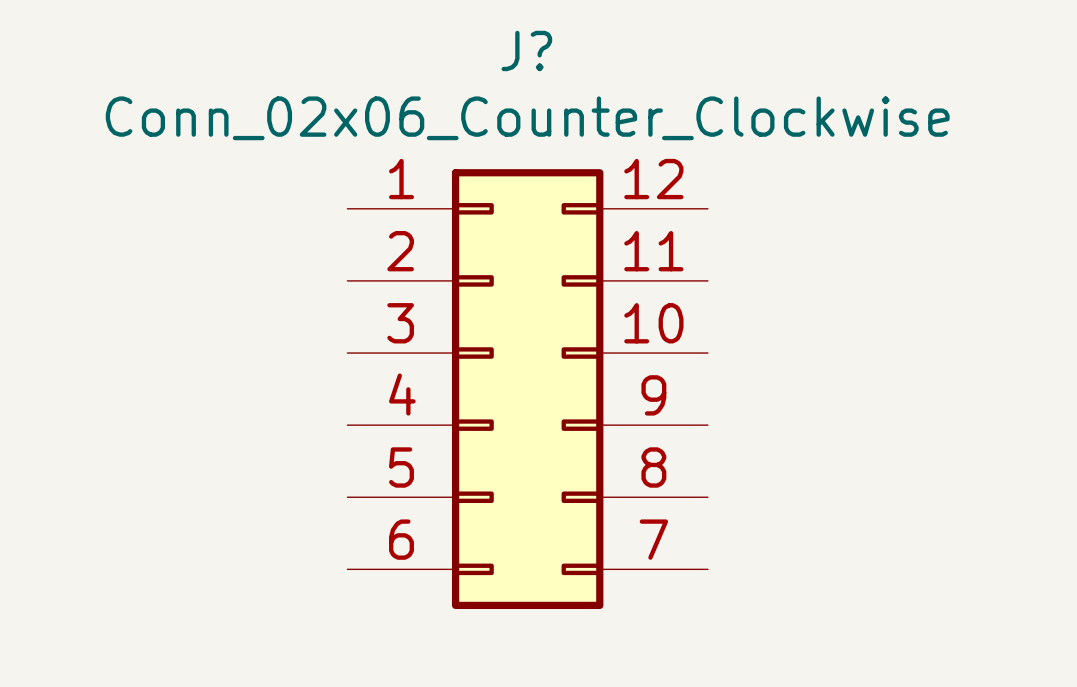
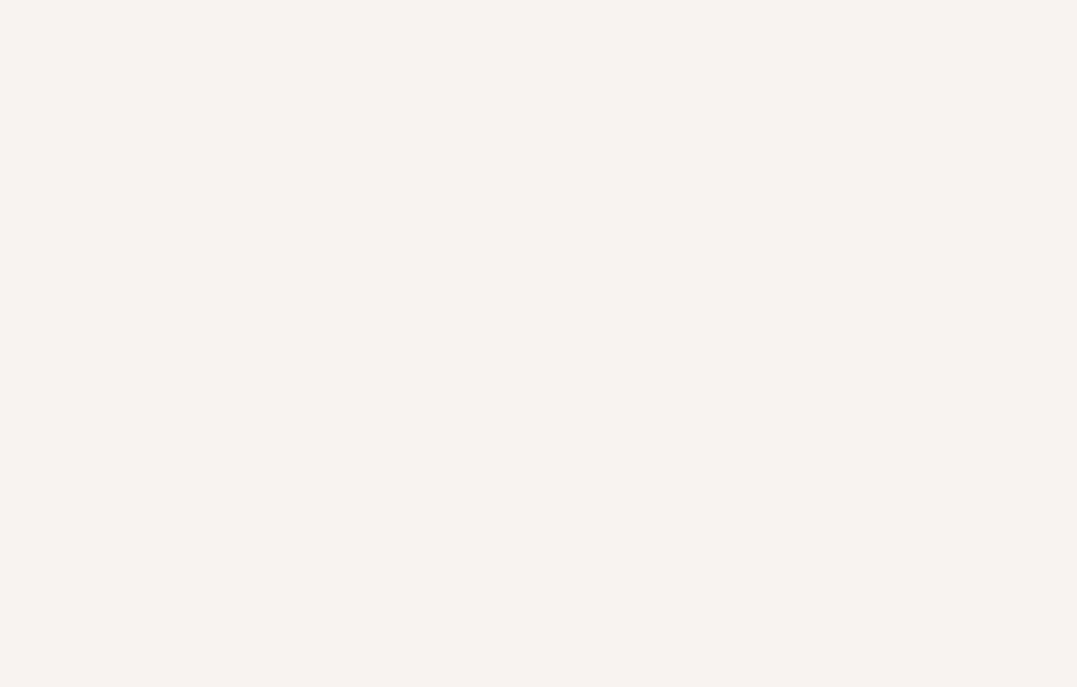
J?: Conn_02x06_Counter_Clockwise (527, 389) -> none

